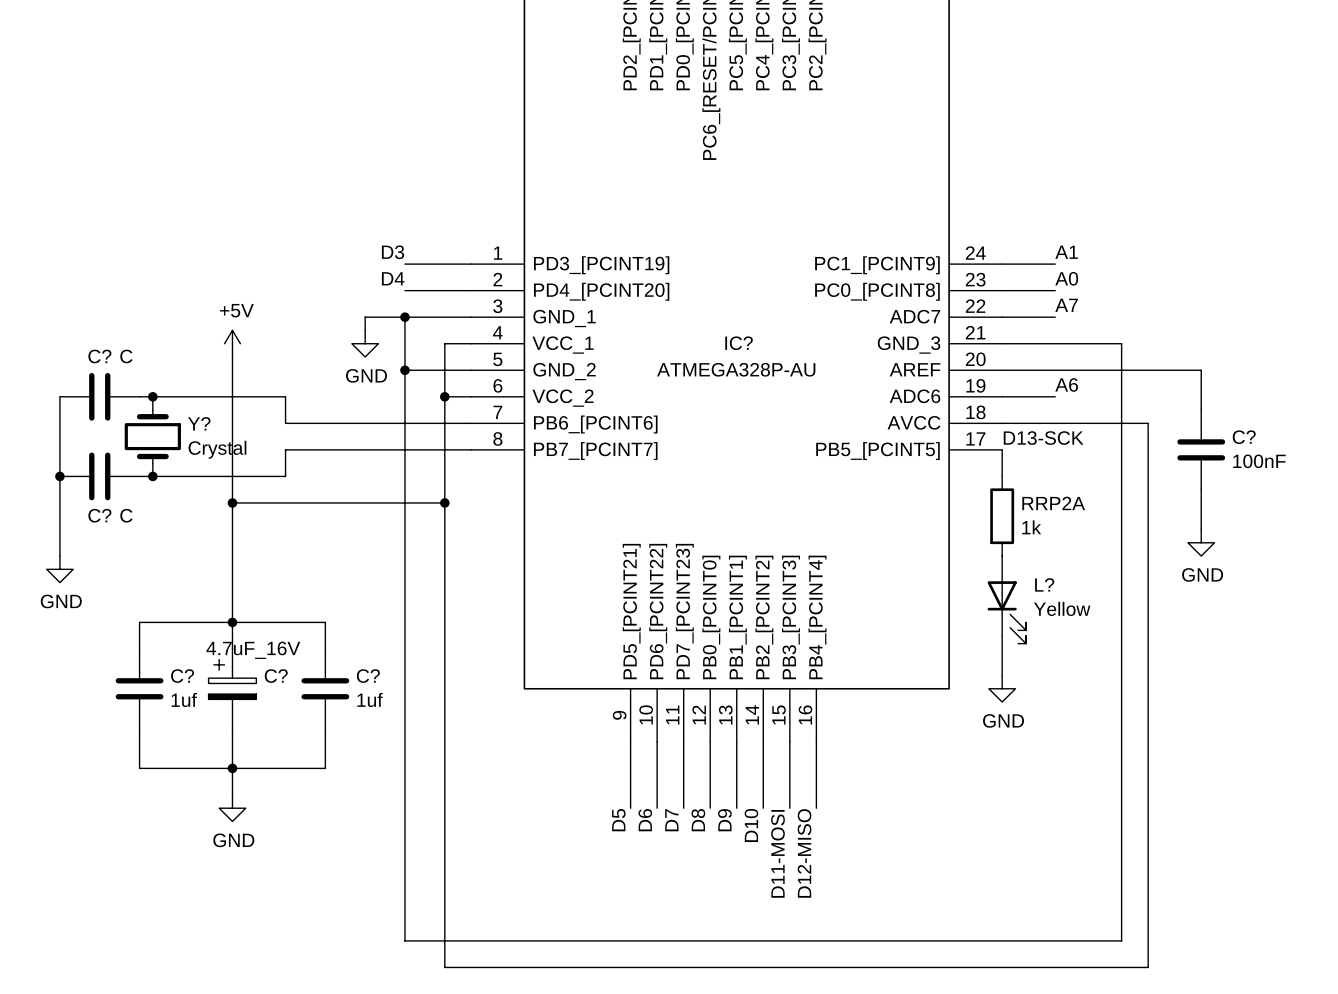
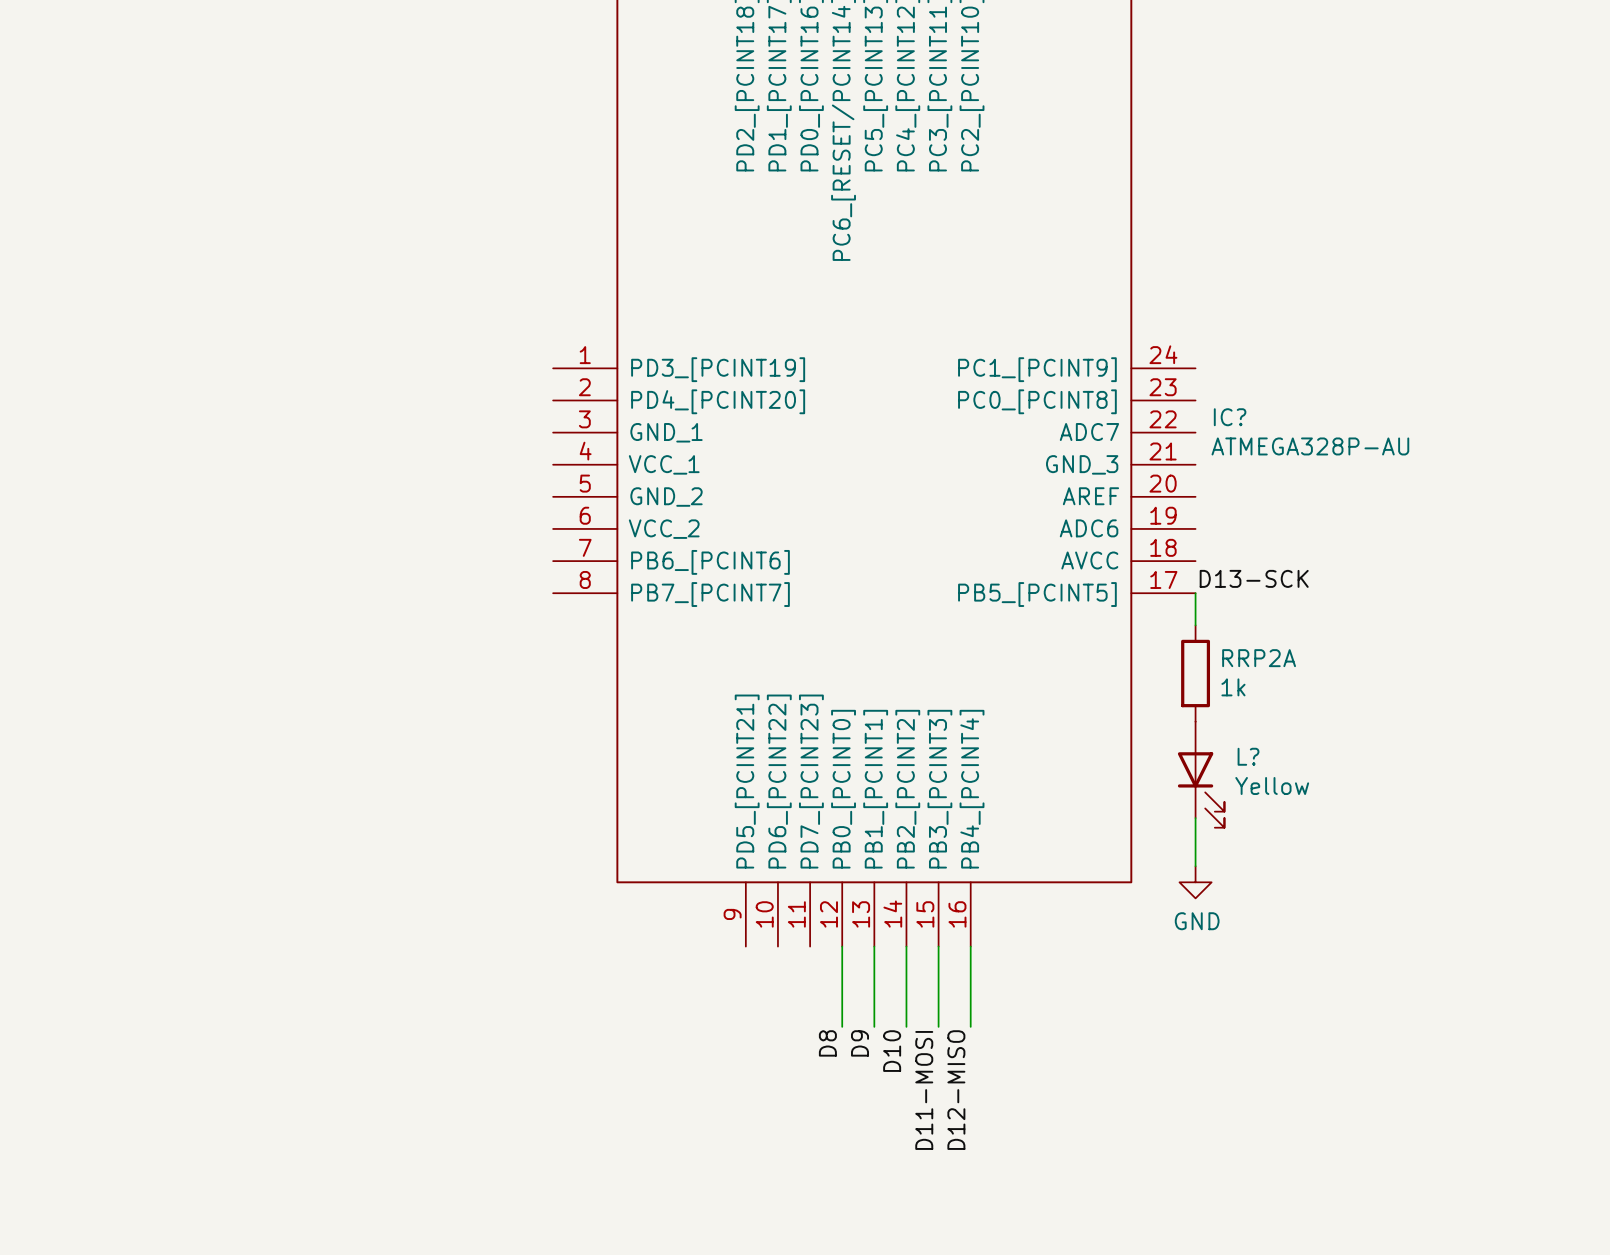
label: D3 (393, 252) -> none
label: A1 (1066, 252) -> none
wire: (404, 264) (471, 264) -> none
wire: (1002, 264) (1055, 264) -> none
label: D4 (393, 278) -> none
label: A0 (1066, 278) -> none
wire: (404, 290) (471, 290) -> none
wire: (1002, 290) (1055, 290) -> none
label: A7 (1066, 305) -> none
wire: (404, 317) (404, 940) (1121, 940) (1121, 343) (1002, 343) -> none
junction: (404, 317) -> none
wire: (471, 317) (365, 317) (365, 330) -> none
wire: (1002, 317) (1055, 317) -> none
power symbol: +5V (232, 343) -> none
power symbol: GND (365, 343) -> none
wire: (471, 343) (444, 343) (444, 967) (1148, 967) (1148, 423) (1002, 423) -> none
IC? name position: IC? (739, 343) -> IC? (1230, 417)
wire: (232, 356) (232, 648) -> none
IC? value position: ATMEGA328P-AU (736, 369) -> ATMEGA328P-AU (1310, 446)
wire: (404, 370) (471, 370) -> none
junction: (404, 370) -> none
wire: (1002, 370) (1201, 370) (1201, 410) -> none
label: A6 (1066, 384) -> none
wire: (59, 396) (59, 556) -> none
C?: C (99, 396) -> none
wire: (139, 396) (285, 396) (285, 423) (471, 423) -> none
junction: (152, 396) -> none
wire: (444, 396) (471, 396) -> none
junction: (444, 396) -> none
wire: (1002, 396) (1055, 396) -> none
Y?: Crystal (152, 436) -> none
wire: (471, 449) (285, 449) (285, 476) (139, 476) -> none
C?: 100nF (1201, 449) -> none
junction: (59, 476) -> none
C?: C (99, 476) -> none
junction: (152, 476) -> none
wire: (1201, 489) (1201, 529) -> none
wire: (232, 502) (444, 502) -> none
junction: (232, 502) -> none
junction: (444, 502) -> none
power symbol: GND (1201, 542) -> none
power symbol: GND (59, 569) -> none
junction: (232, 622) -> none
wire: (139, 648) (139, 622) (325, 622) (325, 648) -> none
C?: 1uf (139, 688) -> none
C?: 4.7uF_16V (232, 688) -> none
C?: 1uf (325, 688) -> none
wire: (139, 728) (139, 768) (325, 768) (325, 728) -> none
wire: (232, 728) (232, 794) -> none
wire: (630, 741) (630, 808) -> none
wire: (657, 741) (657, 808) -> none
wire: (683, 741) (683, 808) -> none
junction: (232, 768) -> none
power symbol: GND (232, 808) -> none
label: D5 (618, 820) -> none
label: D6 (645, 820) -> none
label: D7 (671, 820) -> none

